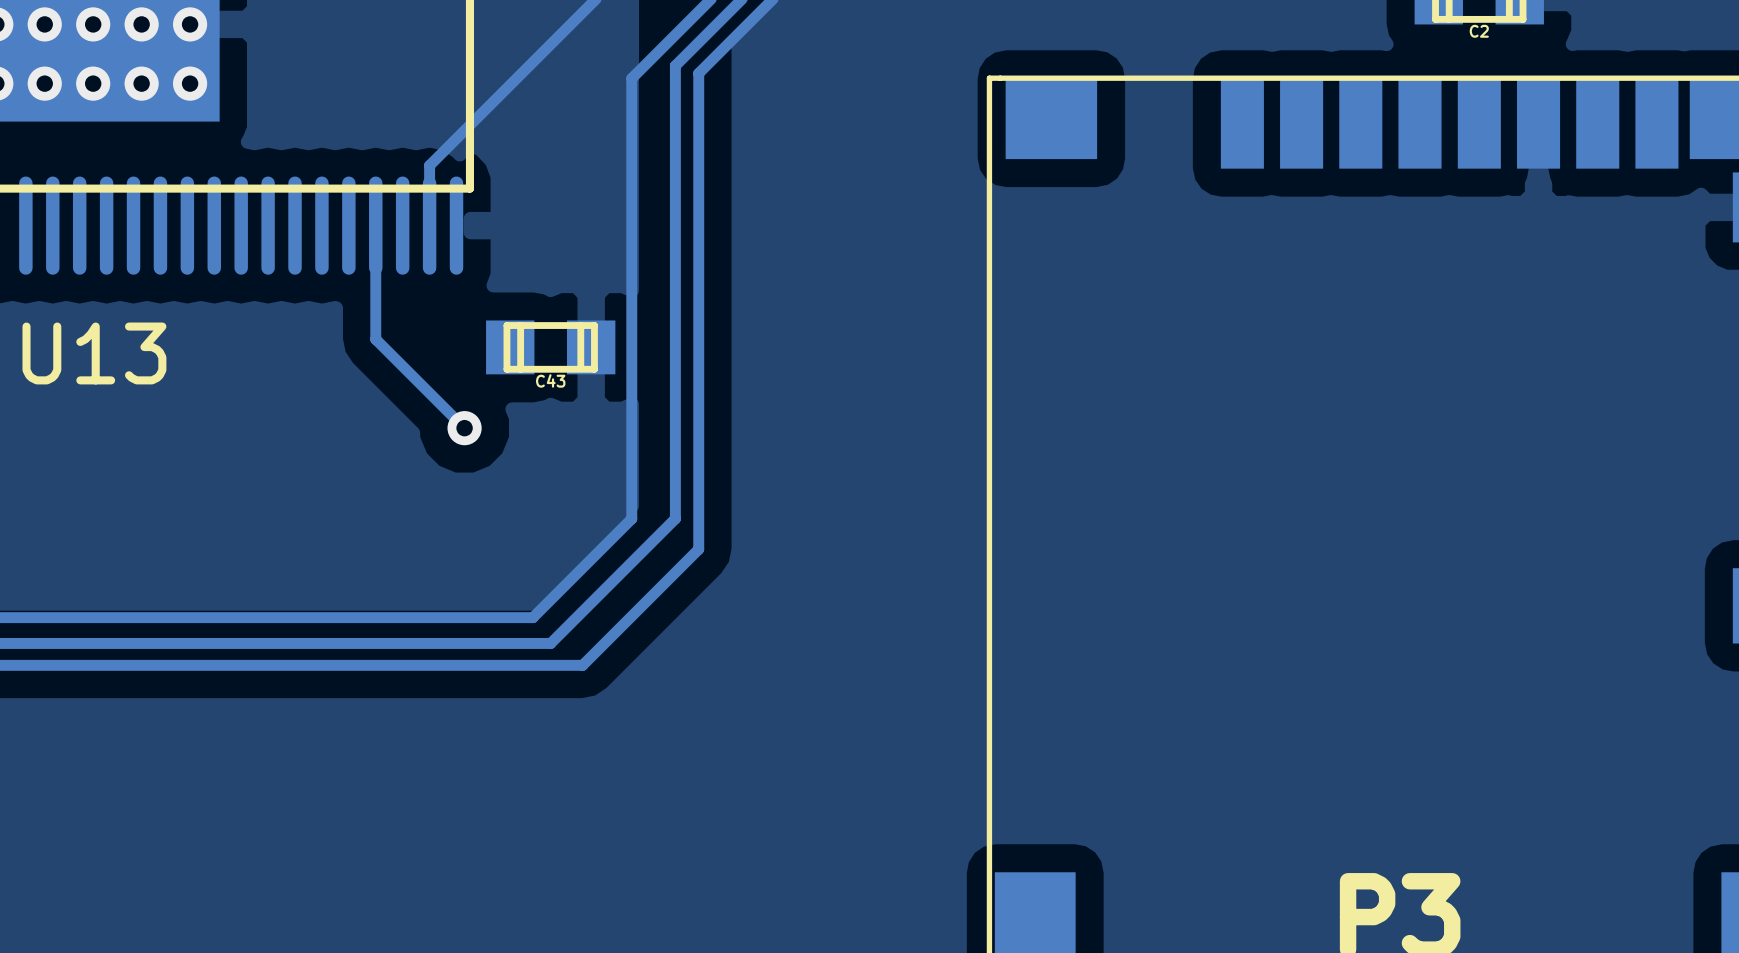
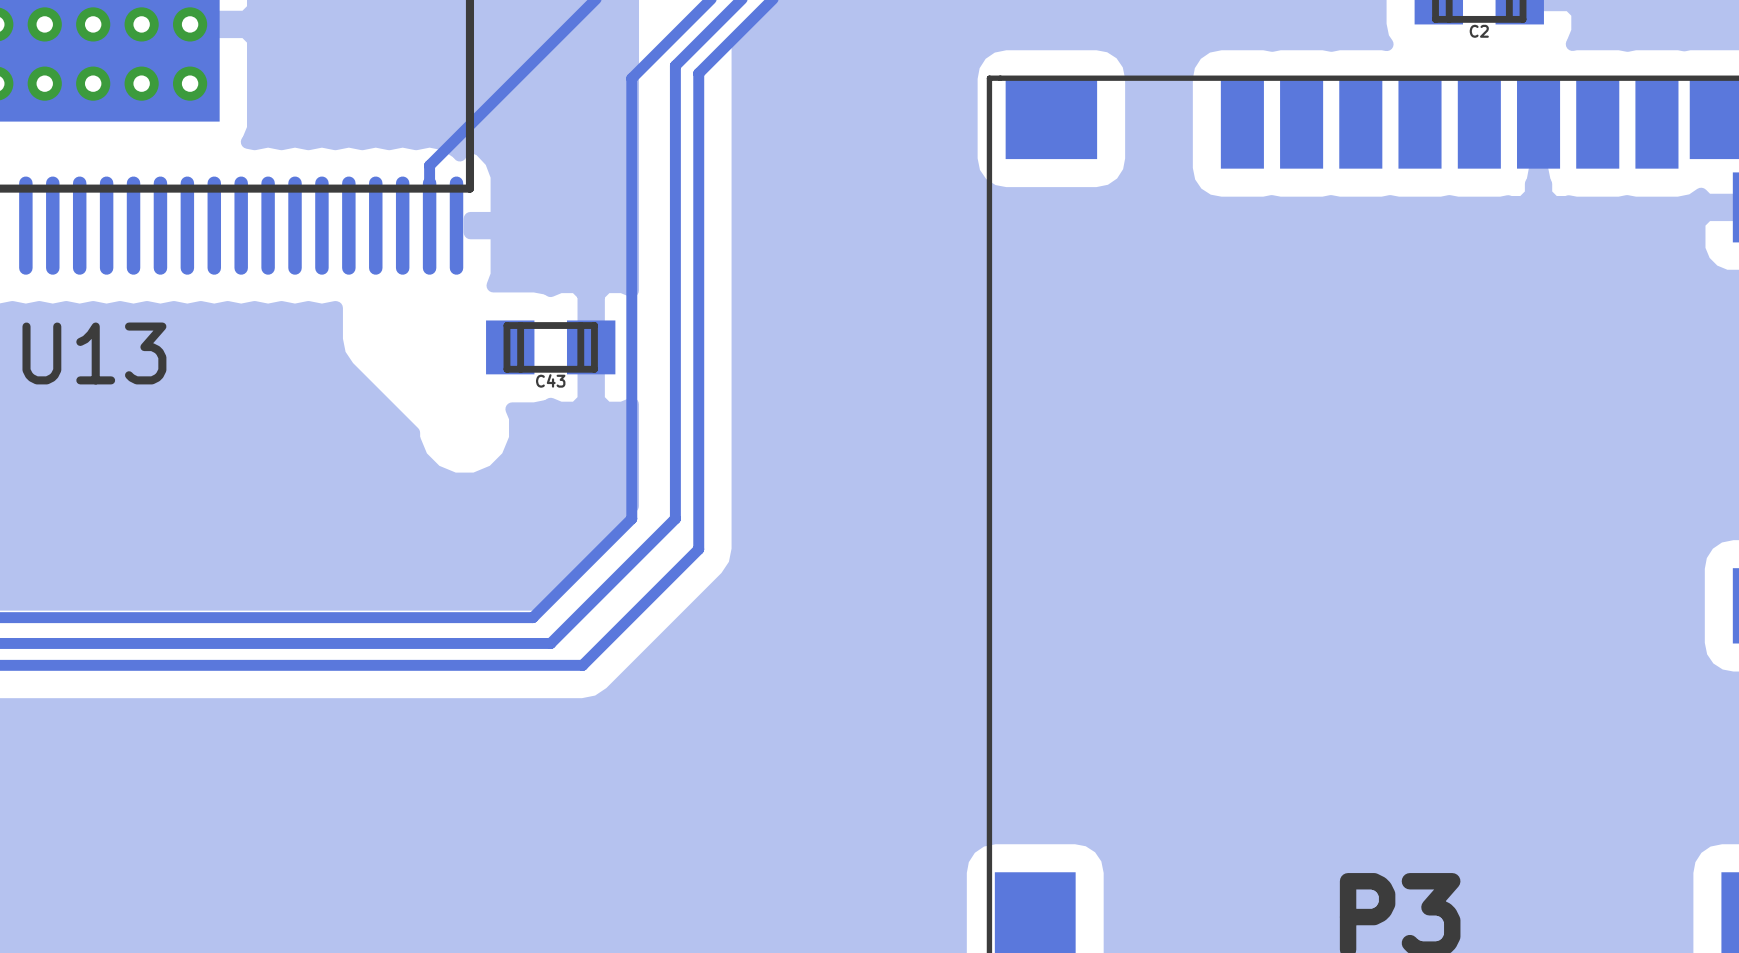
track: (375, 225) (375, 339) (464, 428) -> none
via: (464, 428) -> none

